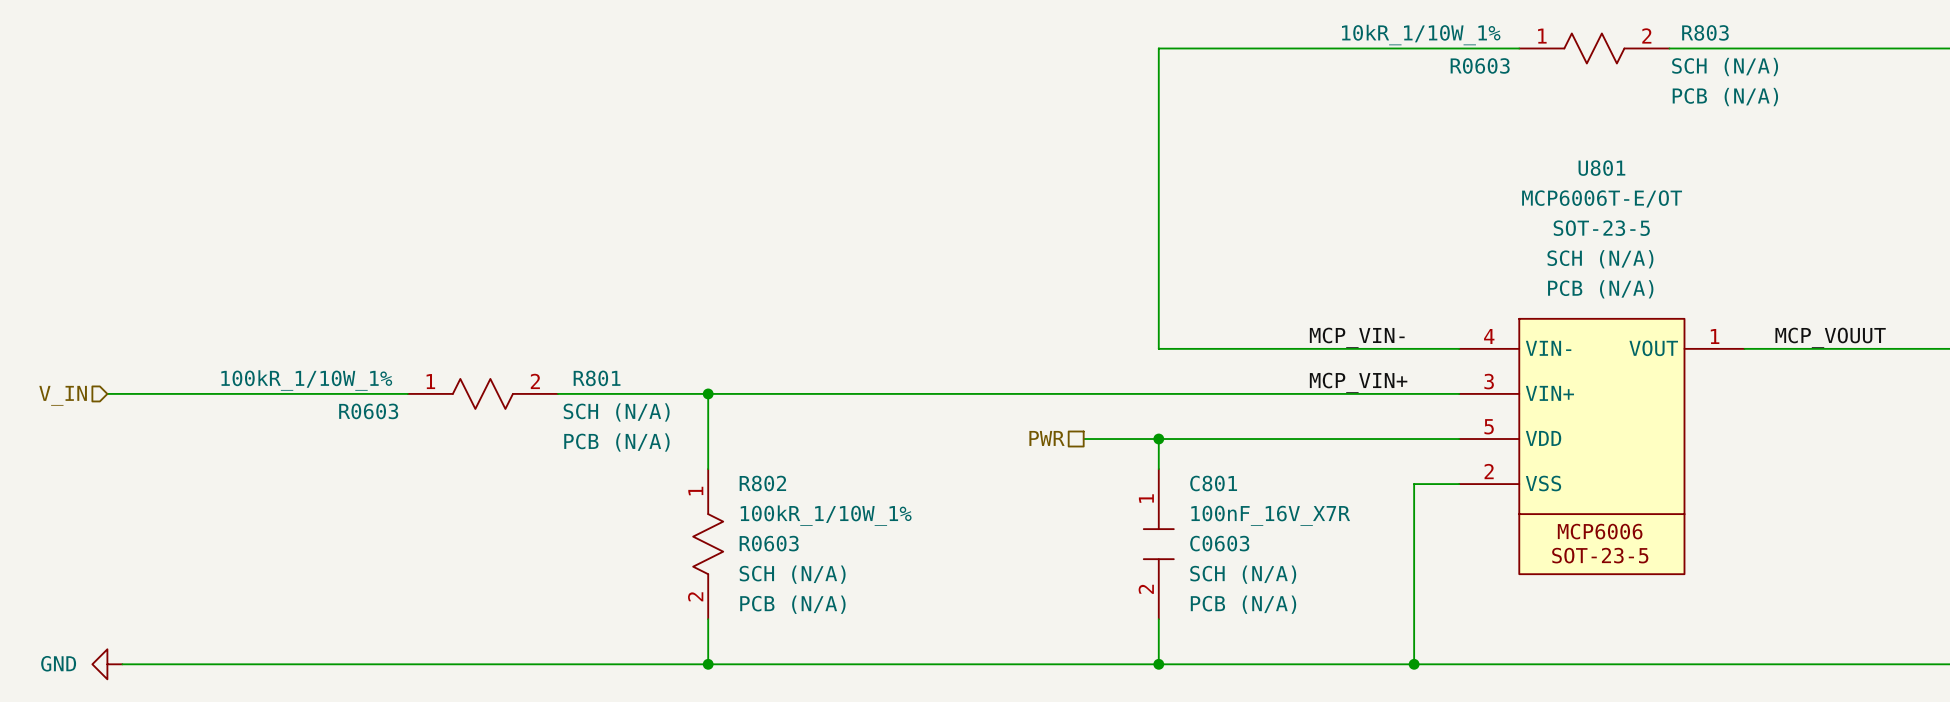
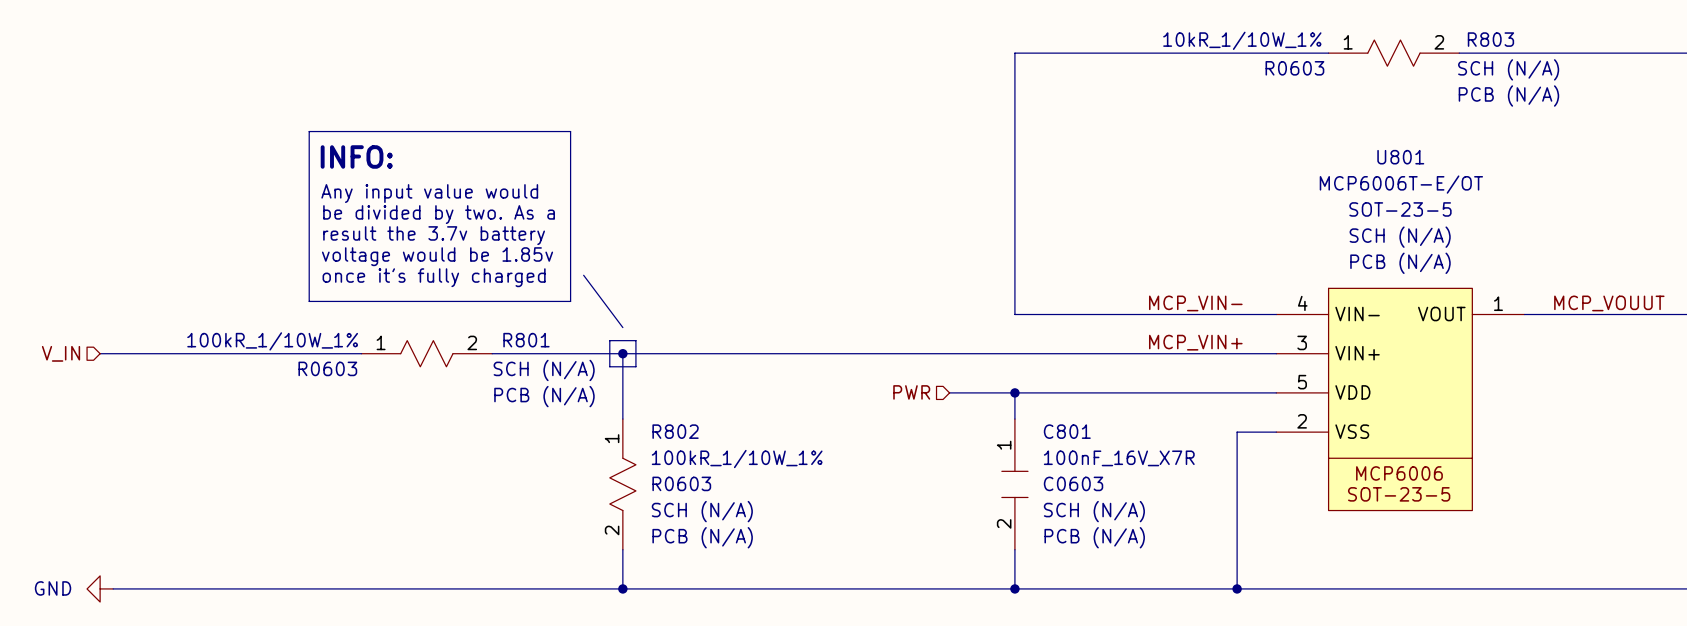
line: none -> (309, 131) (570, 131) (570, 301) (309, 301) (309, 131)
text: none -> INFO: (356, 156)
text: none -> Any input value would (429, 193)
text: none -> be divided by two. As a (439, 214)
text: none -> result the 3.7v battery (434, 235)
text: none -> voltage would be 1.85v (437, 256)
line: none -> (583, 275) (622, 327)
text: none -> once it's fully charged (434, 277)
line: none -> (609, 340) (635, 340) (635, 366) (609, 366) (609, 340)
hierarchical label shape: passive (1047, 438) -> input (911, 392)

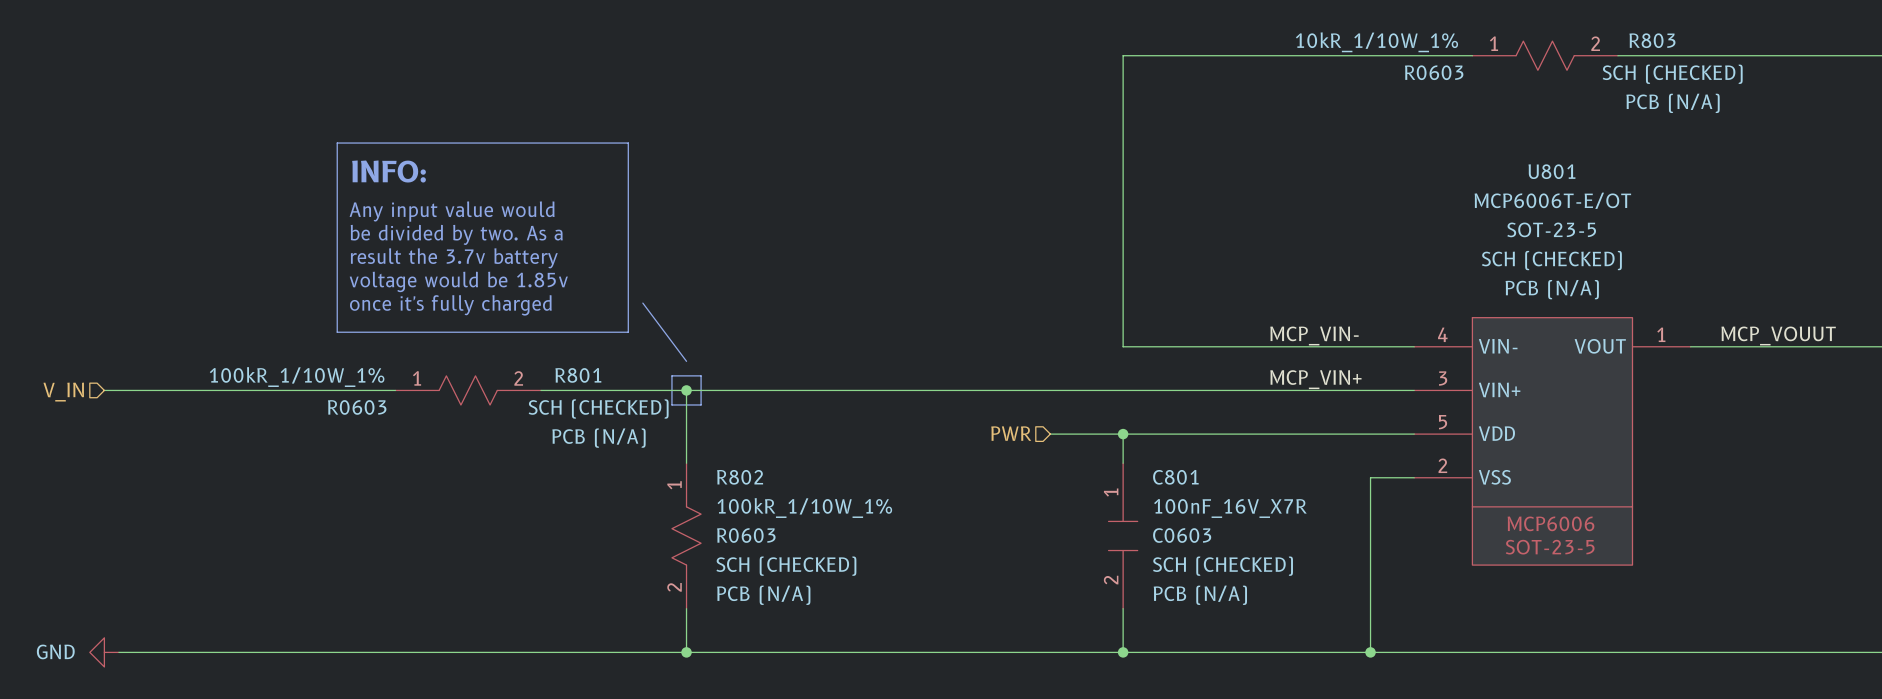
R803 text: SCH (N/A) (1508, 69) -> SCH (CHECKED) (1672, 74)
U801 text: SCH (N/A) (1400, 237) -> SCH (CHECKED) (1551, 260)
R801 text: SCH (N/A) (544, 370) -> SCH (CHECKED) (598, 408)
R802 text: SCH (N/A) (702, 511) -> SCH (CHECKED) (786, 566)
C801 text: SCH (N/A) (1094, 511) -> SCH (CHECKED) (1222, 566)

